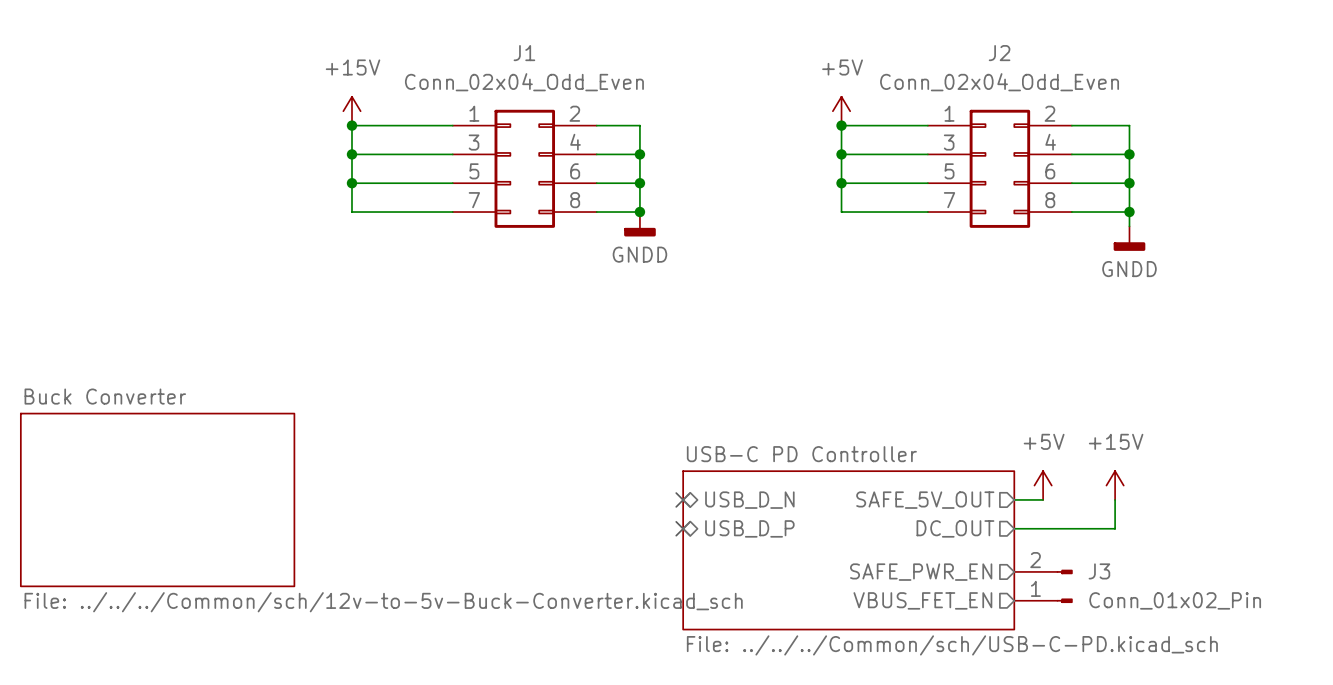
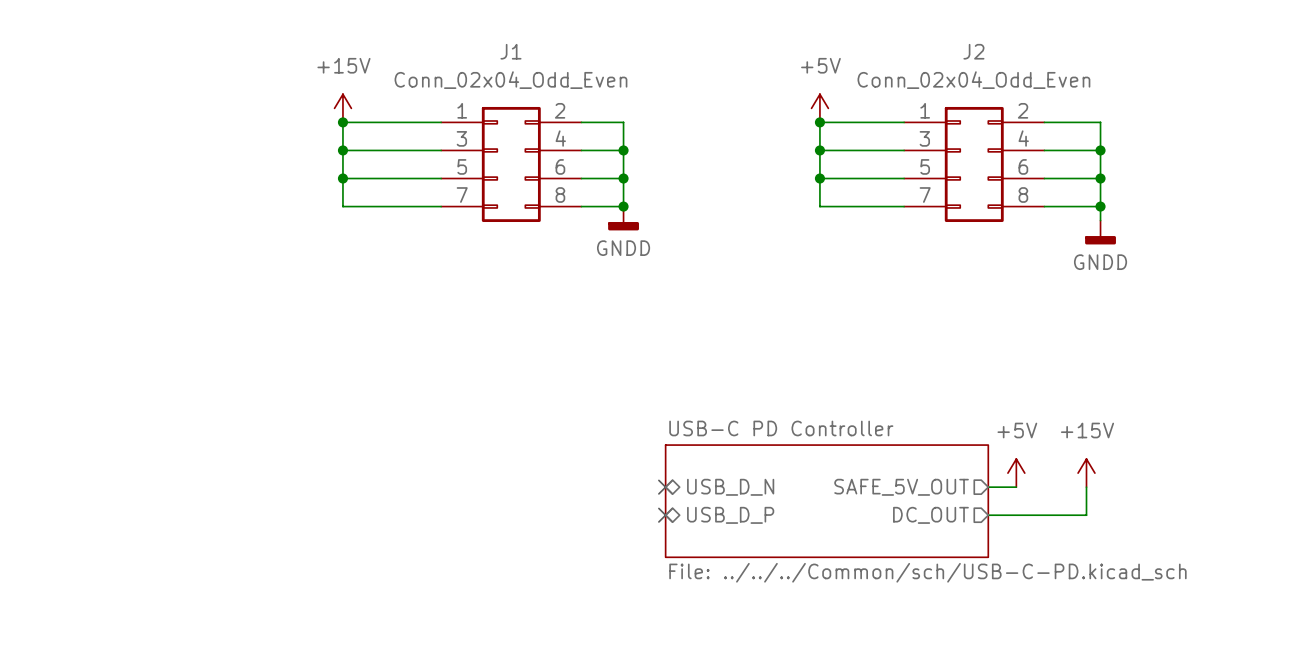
sheet Buck Converter: File: ../../../Common/sch/12v-to-5v-Buck-Converter.kicad_sch (157, 499) -> none
sheet USB-C PD Controller: none -> File: ../../../Common/sch/USB-C-PD.kicad_sch (826, 501)
sheet USB-C PD Controller: File: ../../../Common/sch/USB-C-PD.kicad_sch (848, 550) -> none
sheet pin: SAFE_PWR_EN (921, 572) -> none
J3: Conn_01x02_Pin (1043, 586) -> none
sheet pin: VBUS_FET_EN (922, 600) -> none

